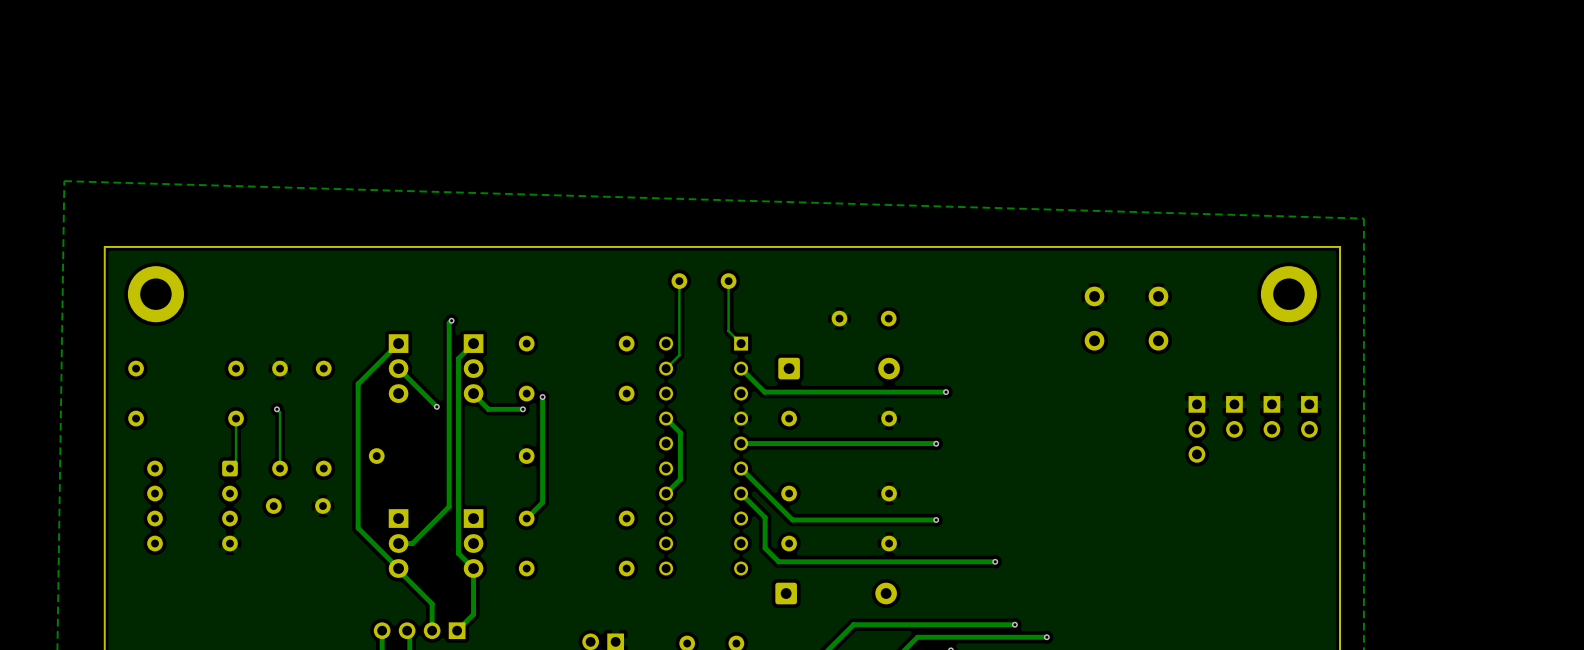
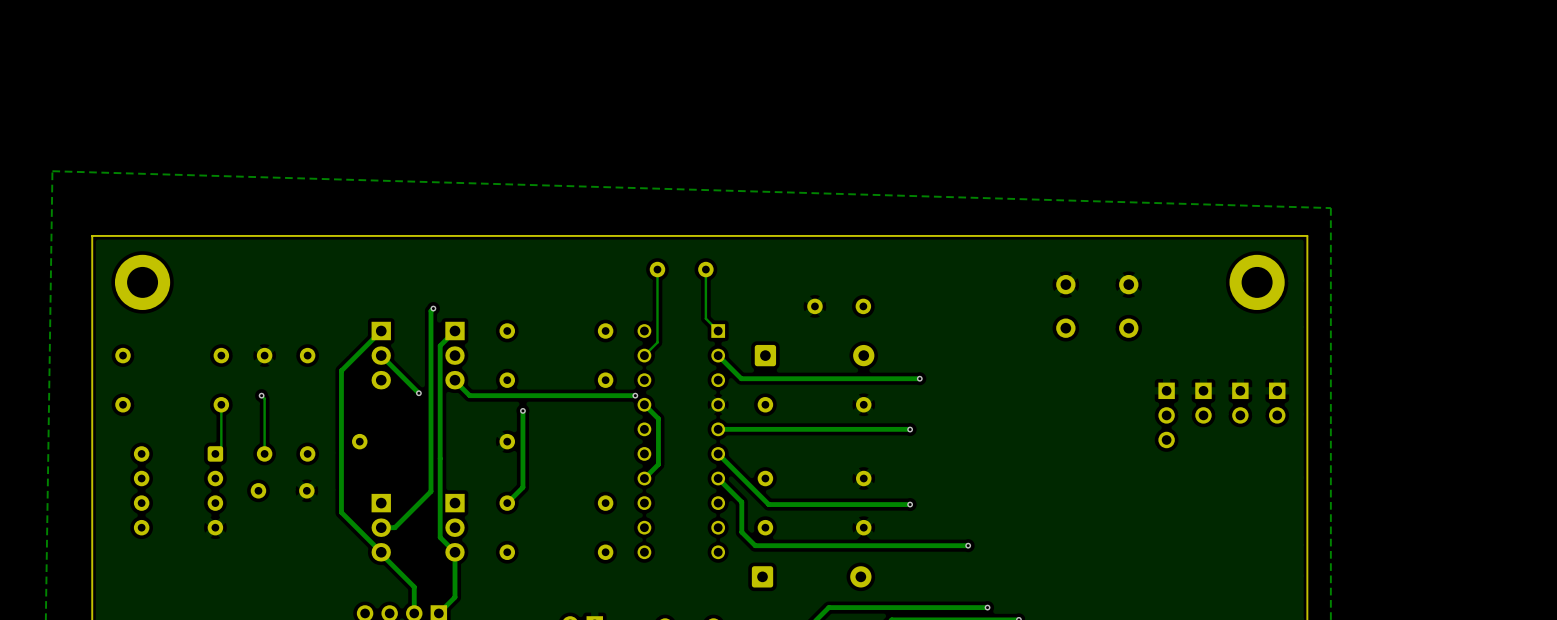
track: (542, 397) (542, 424) -> none
via: (542, 397) -> none
via: (522, 409) -> none
track: none -> (635, 395) (503, 395)
via: none -> (635, 395)
via: none -> (522, 410)

